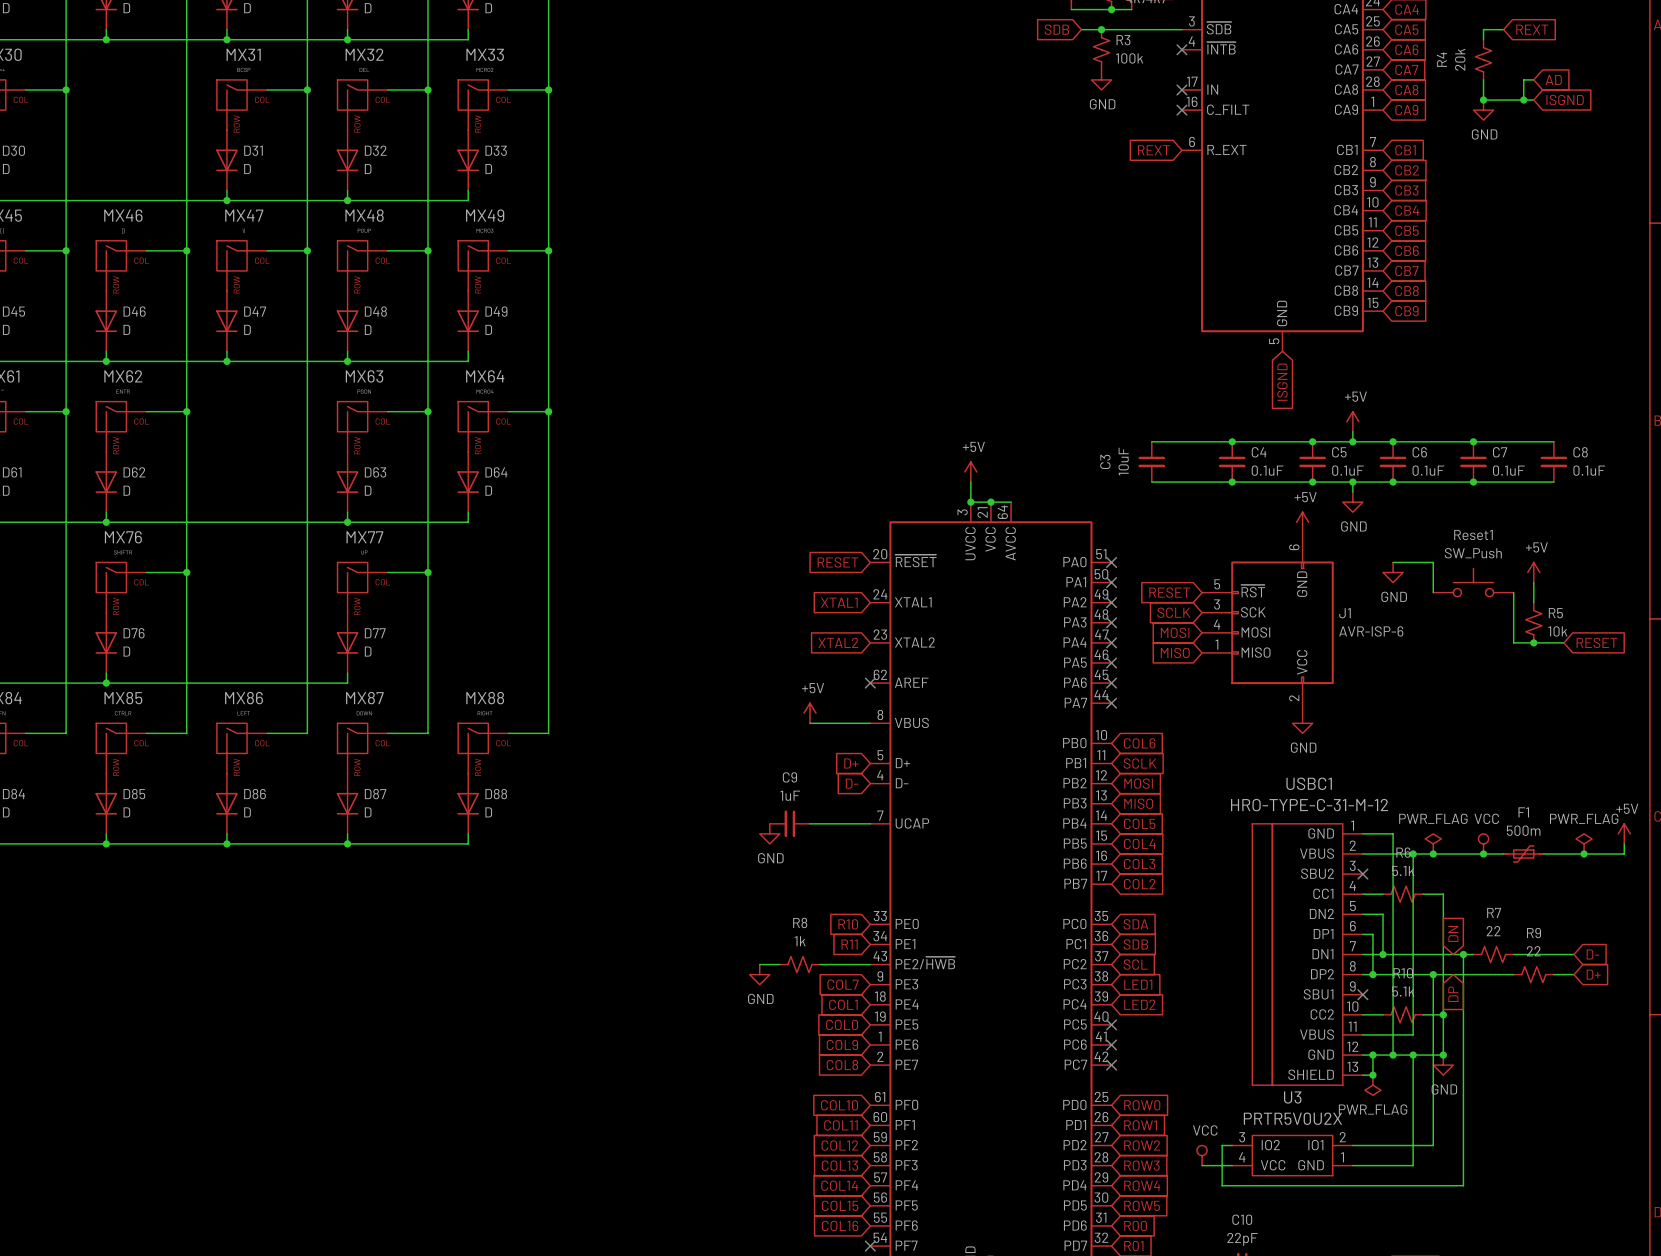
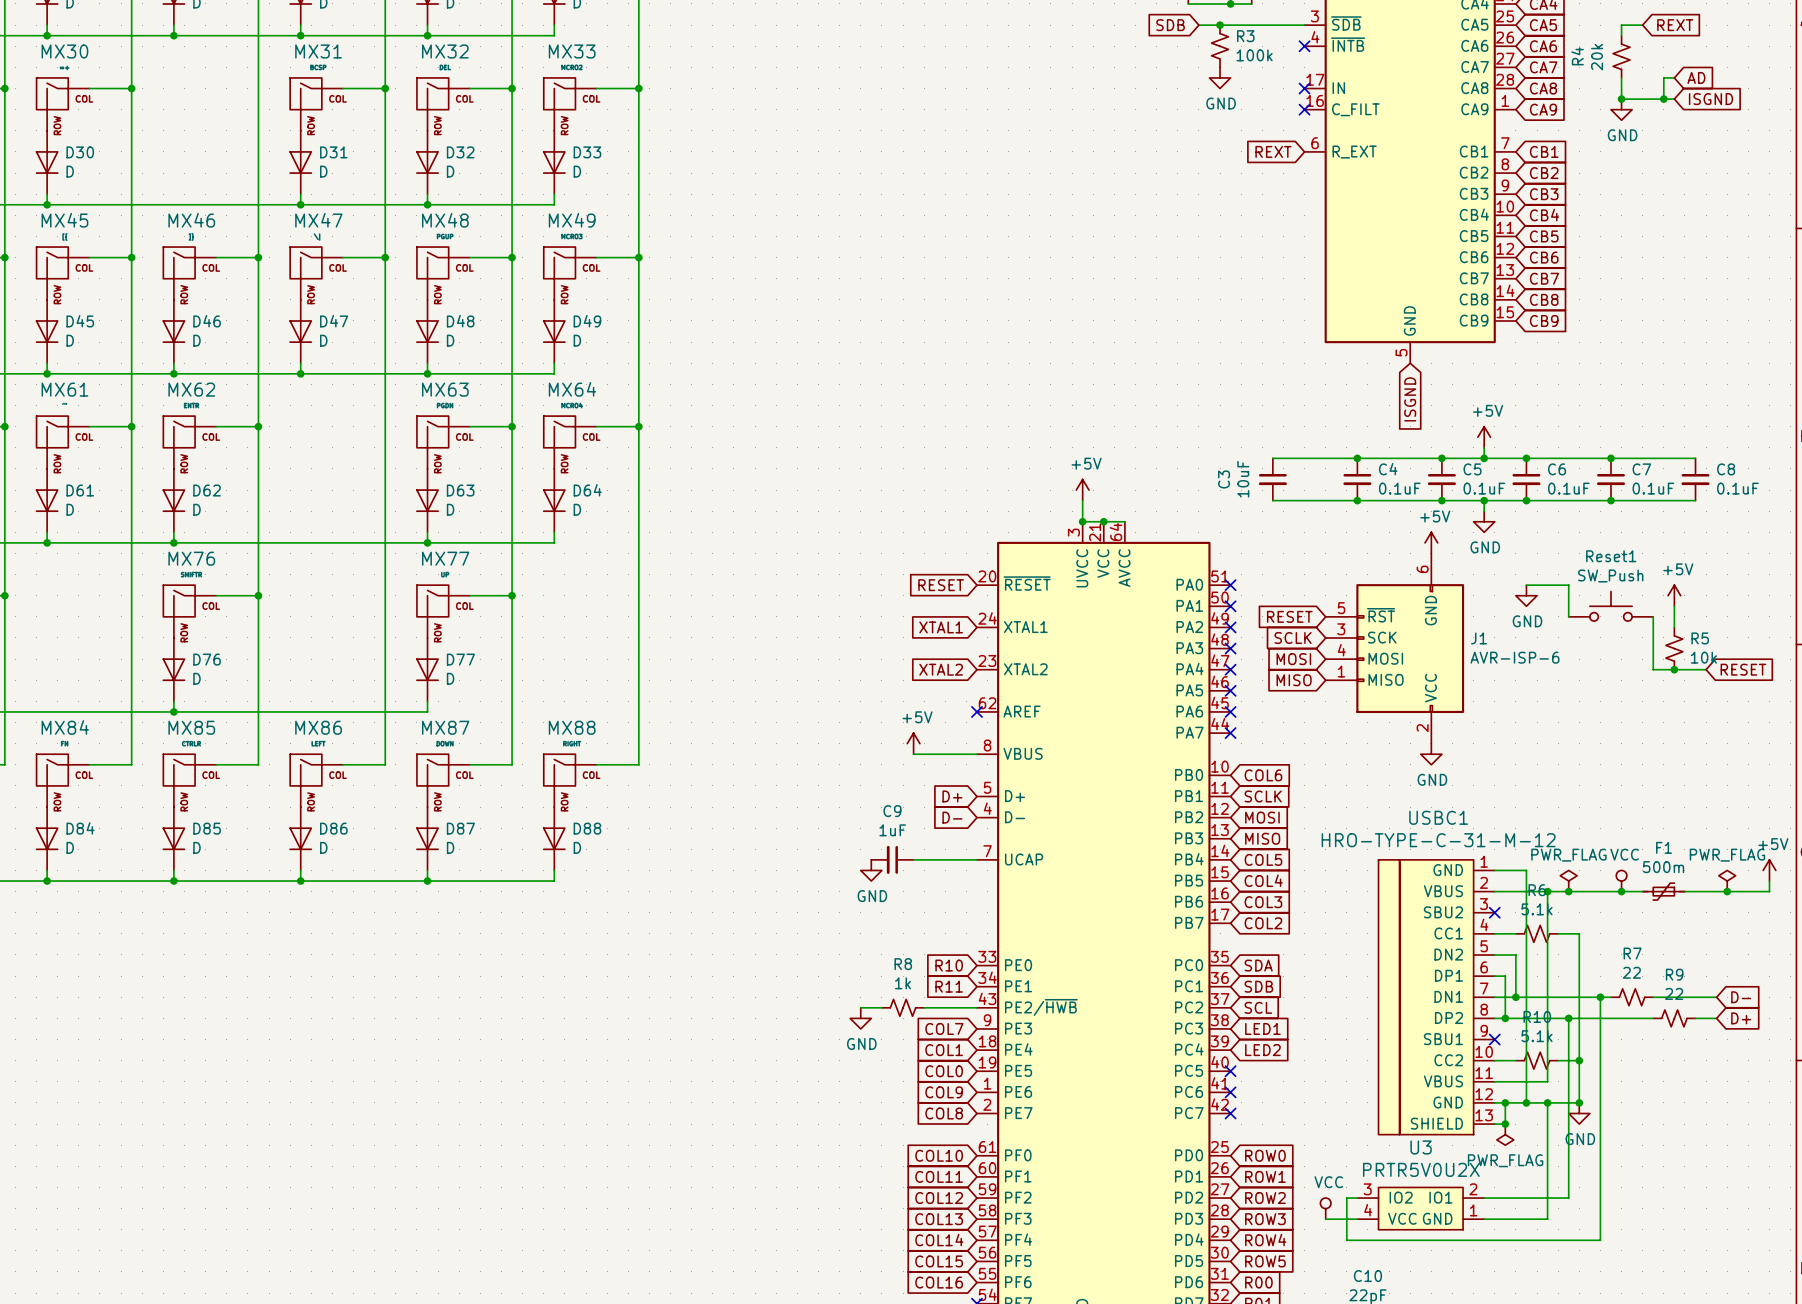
global label: DN (1453, 933) -> none
global label: DP (1453, 994) -> none

